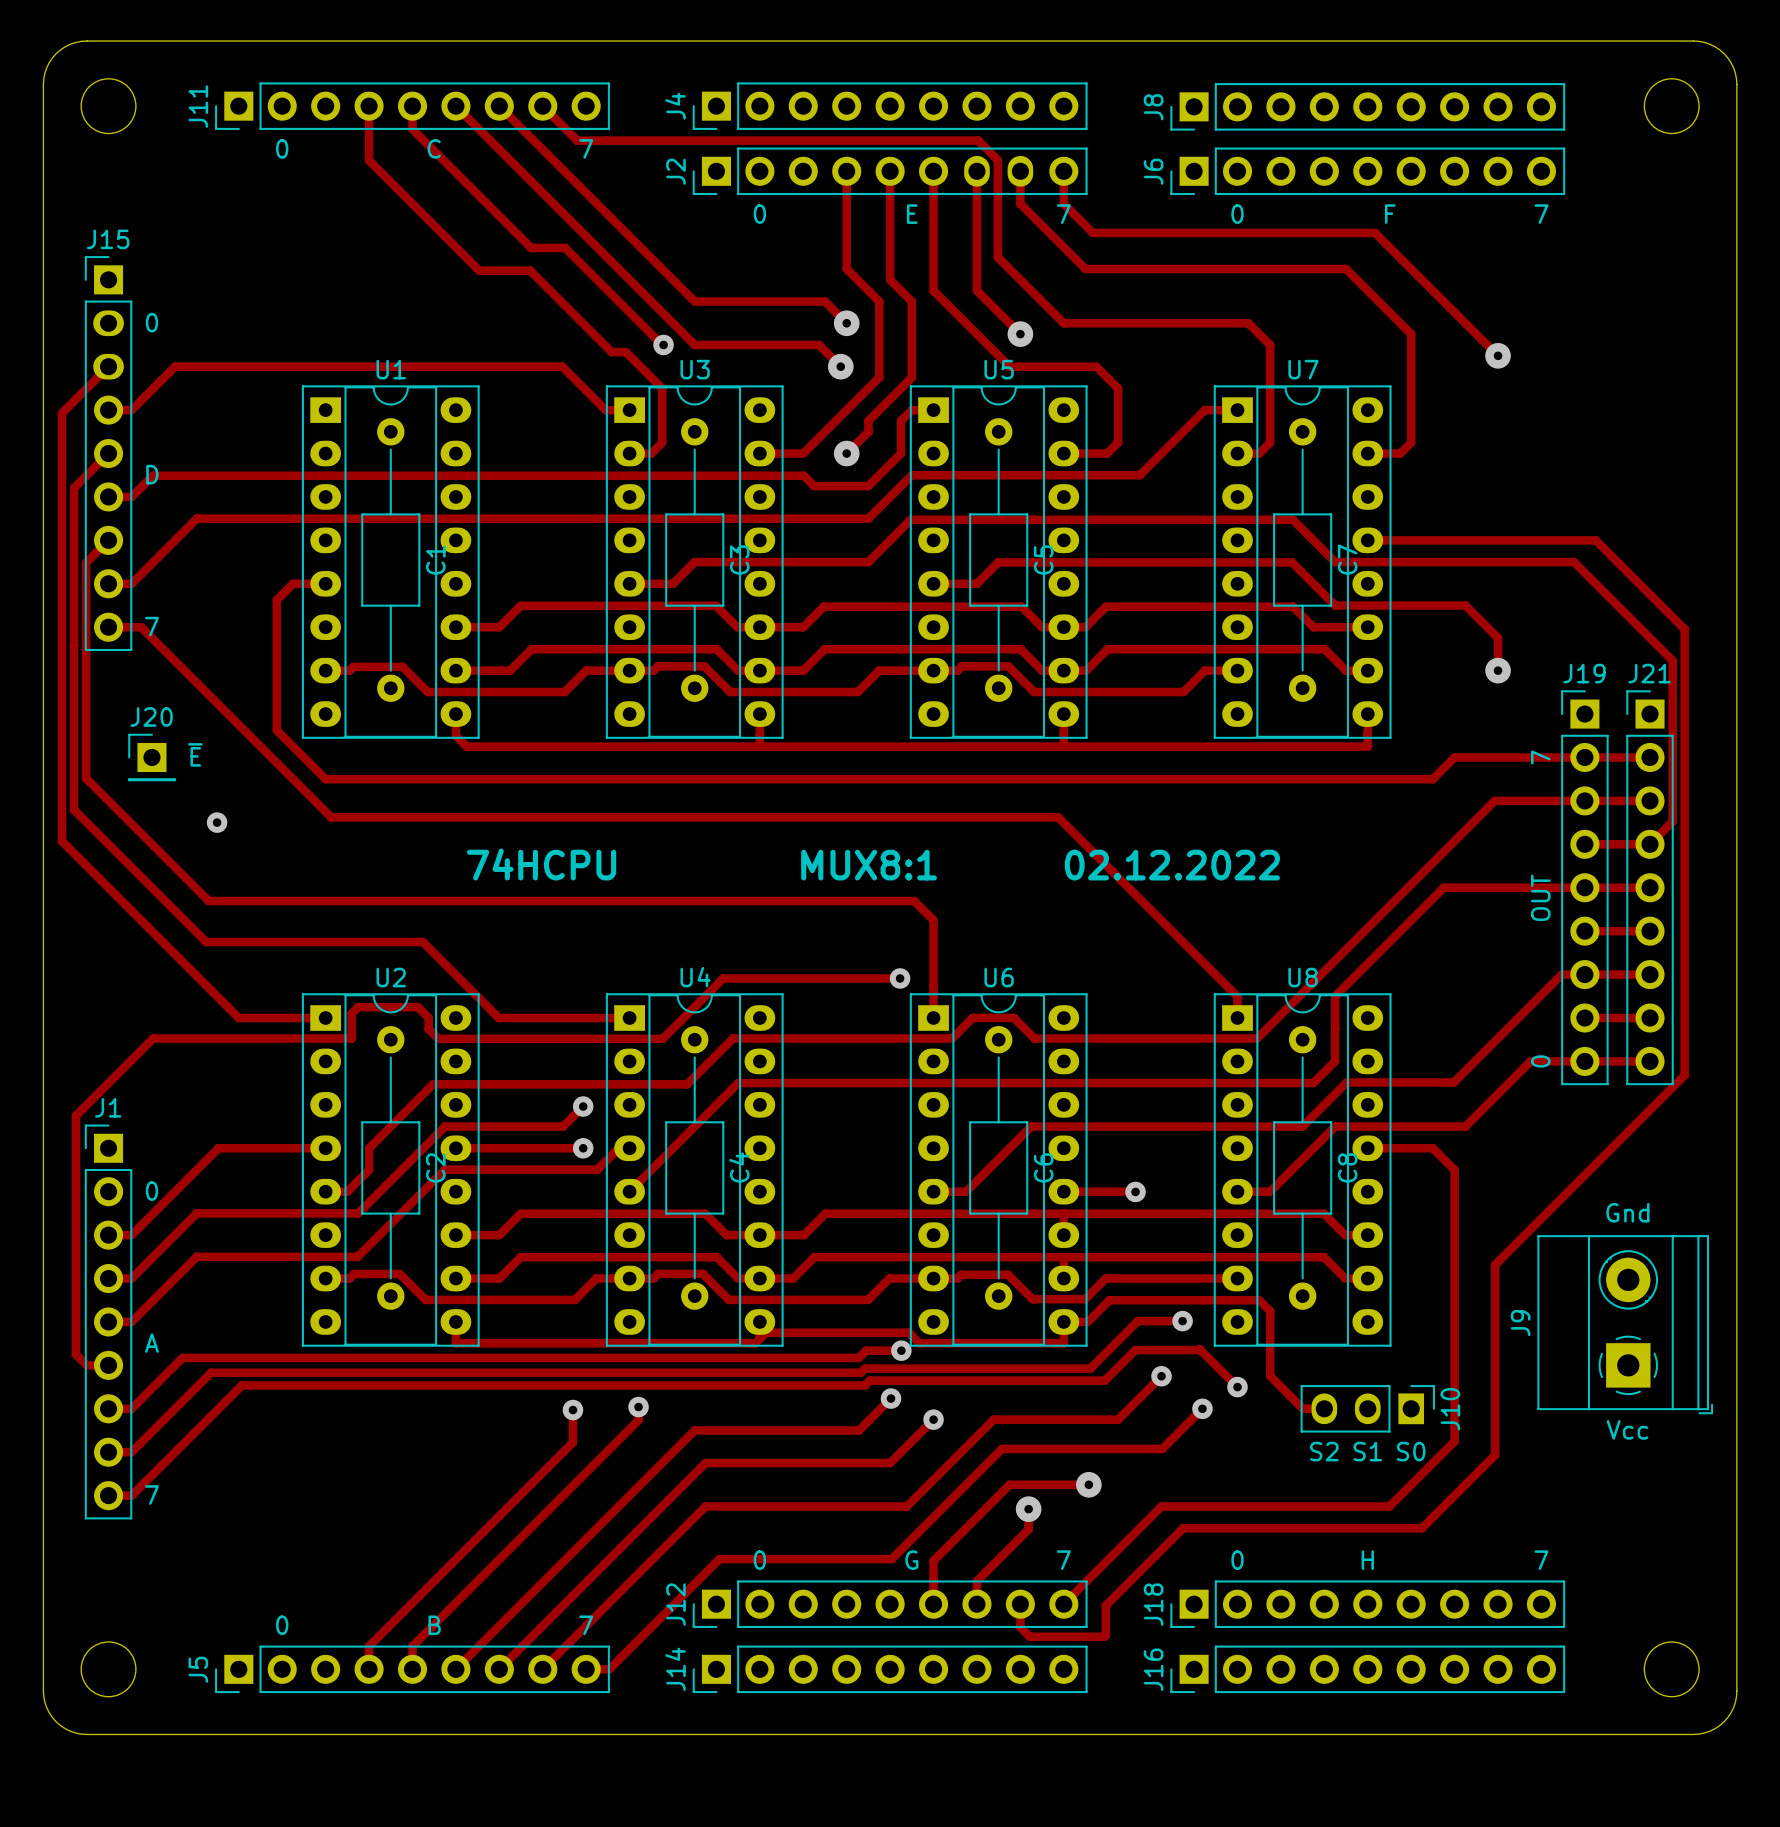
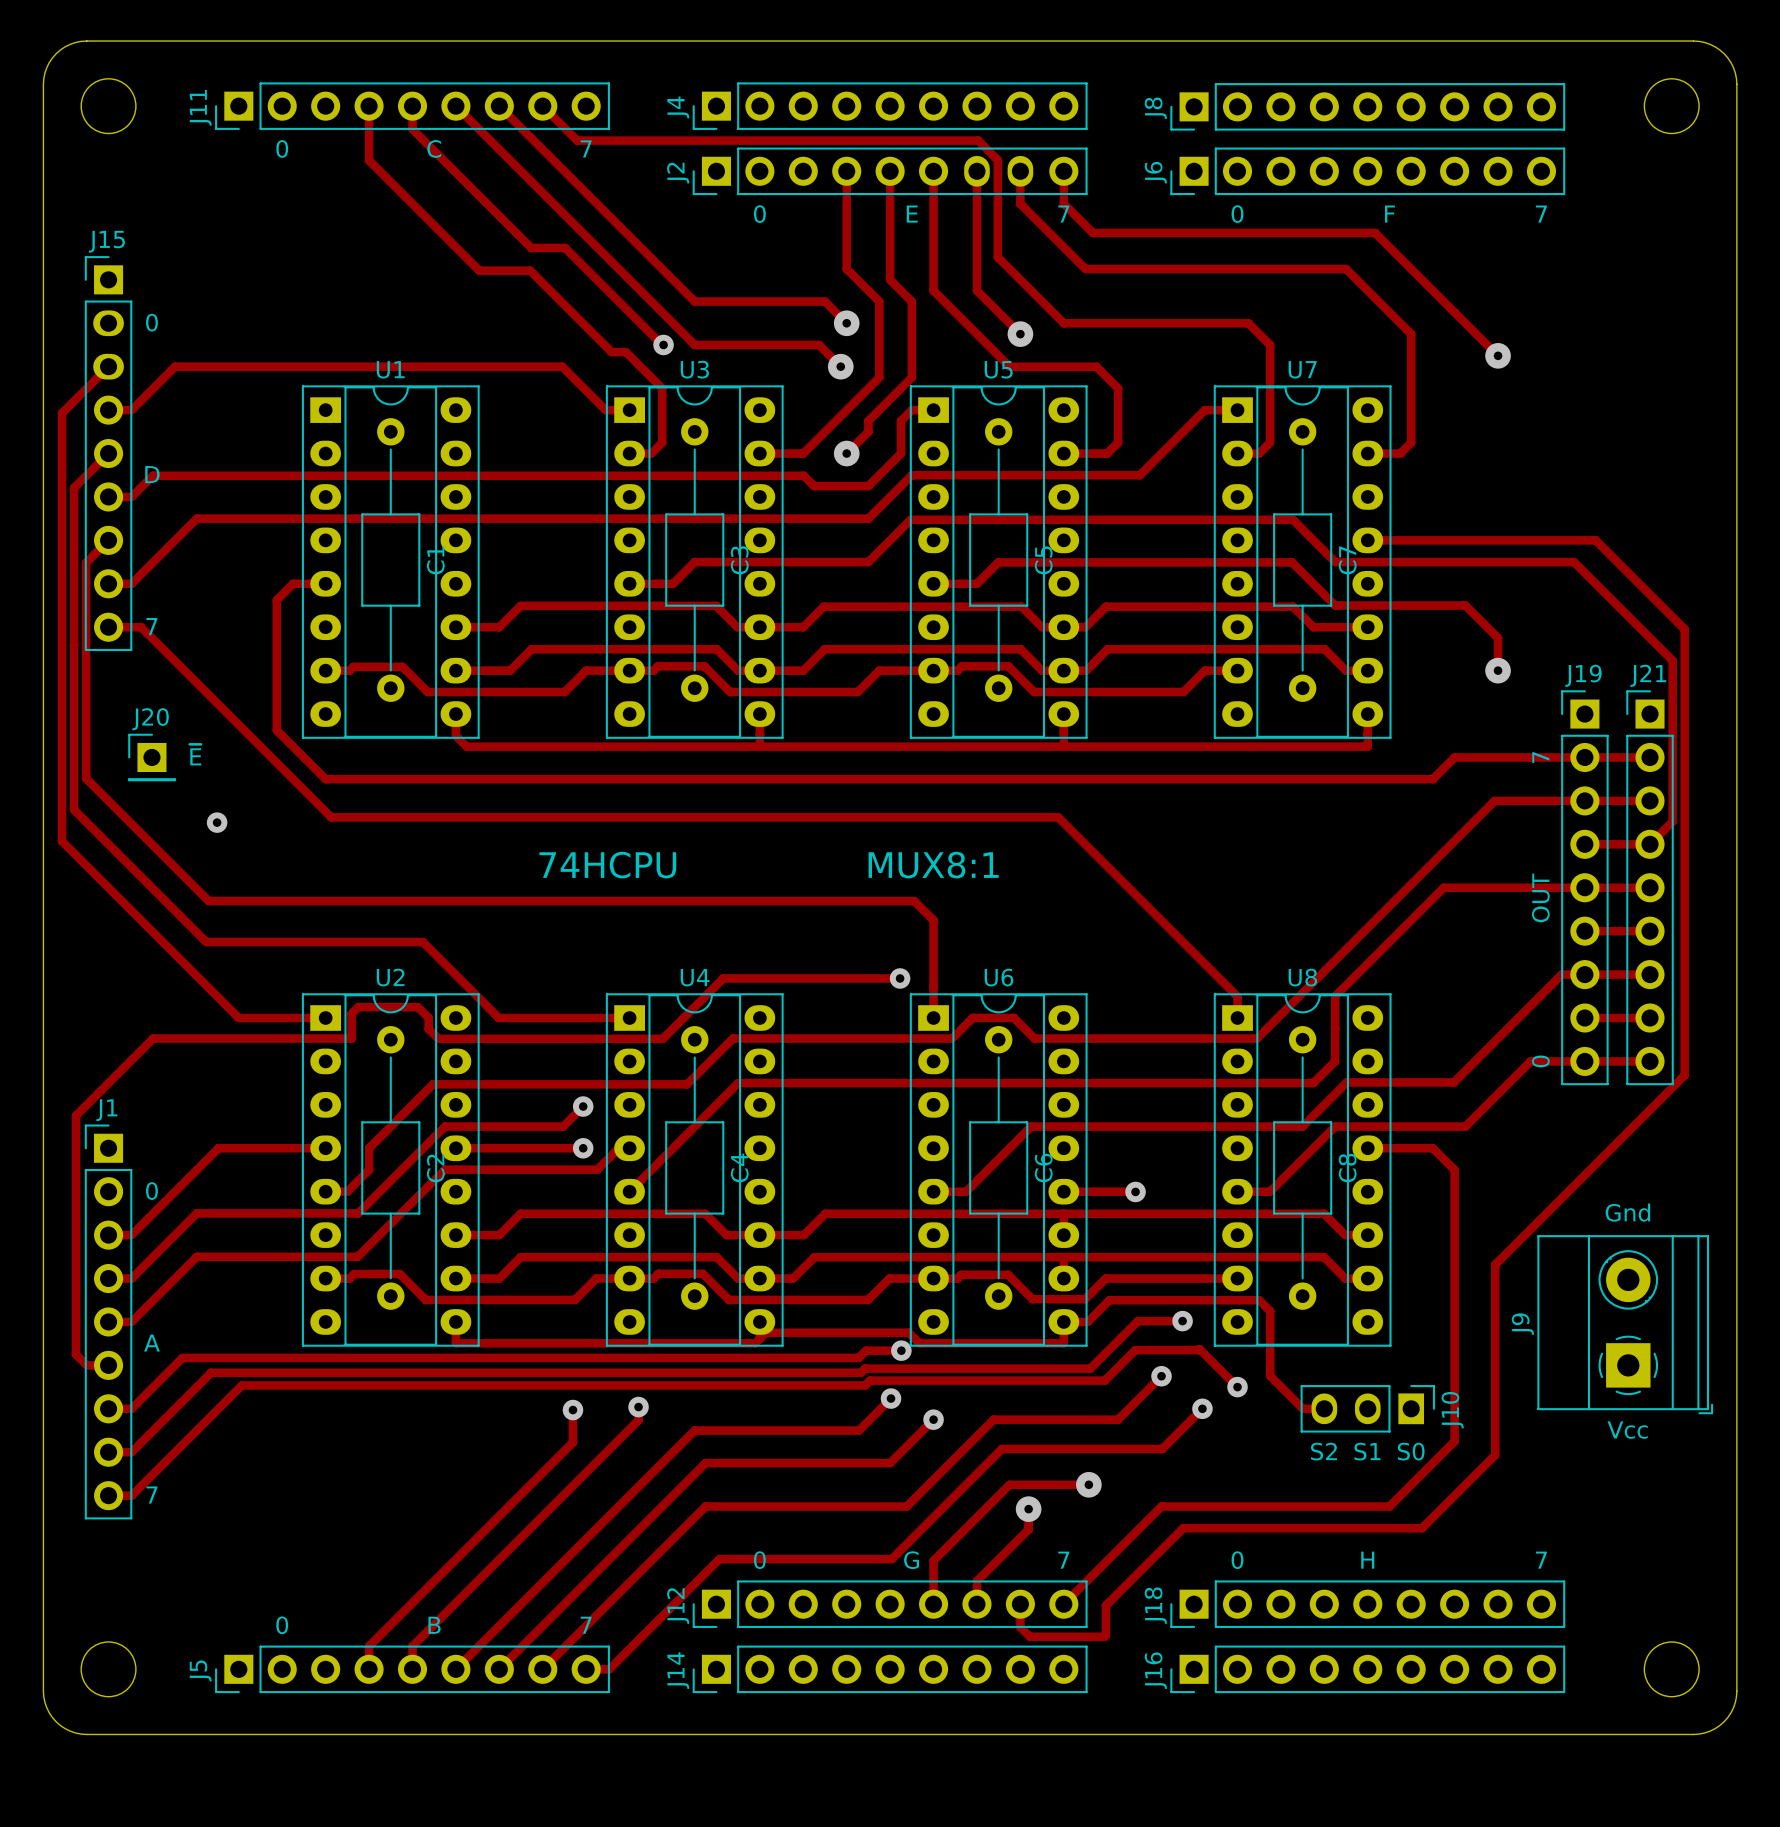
text position: 74HCPU (541, 864) -> 74HCPU (607, 865)
text position: MUX8:1 (869, 865) -> MUX8:1 (933, 865)
text: 02.12.2022 (1172, 865) -> none

